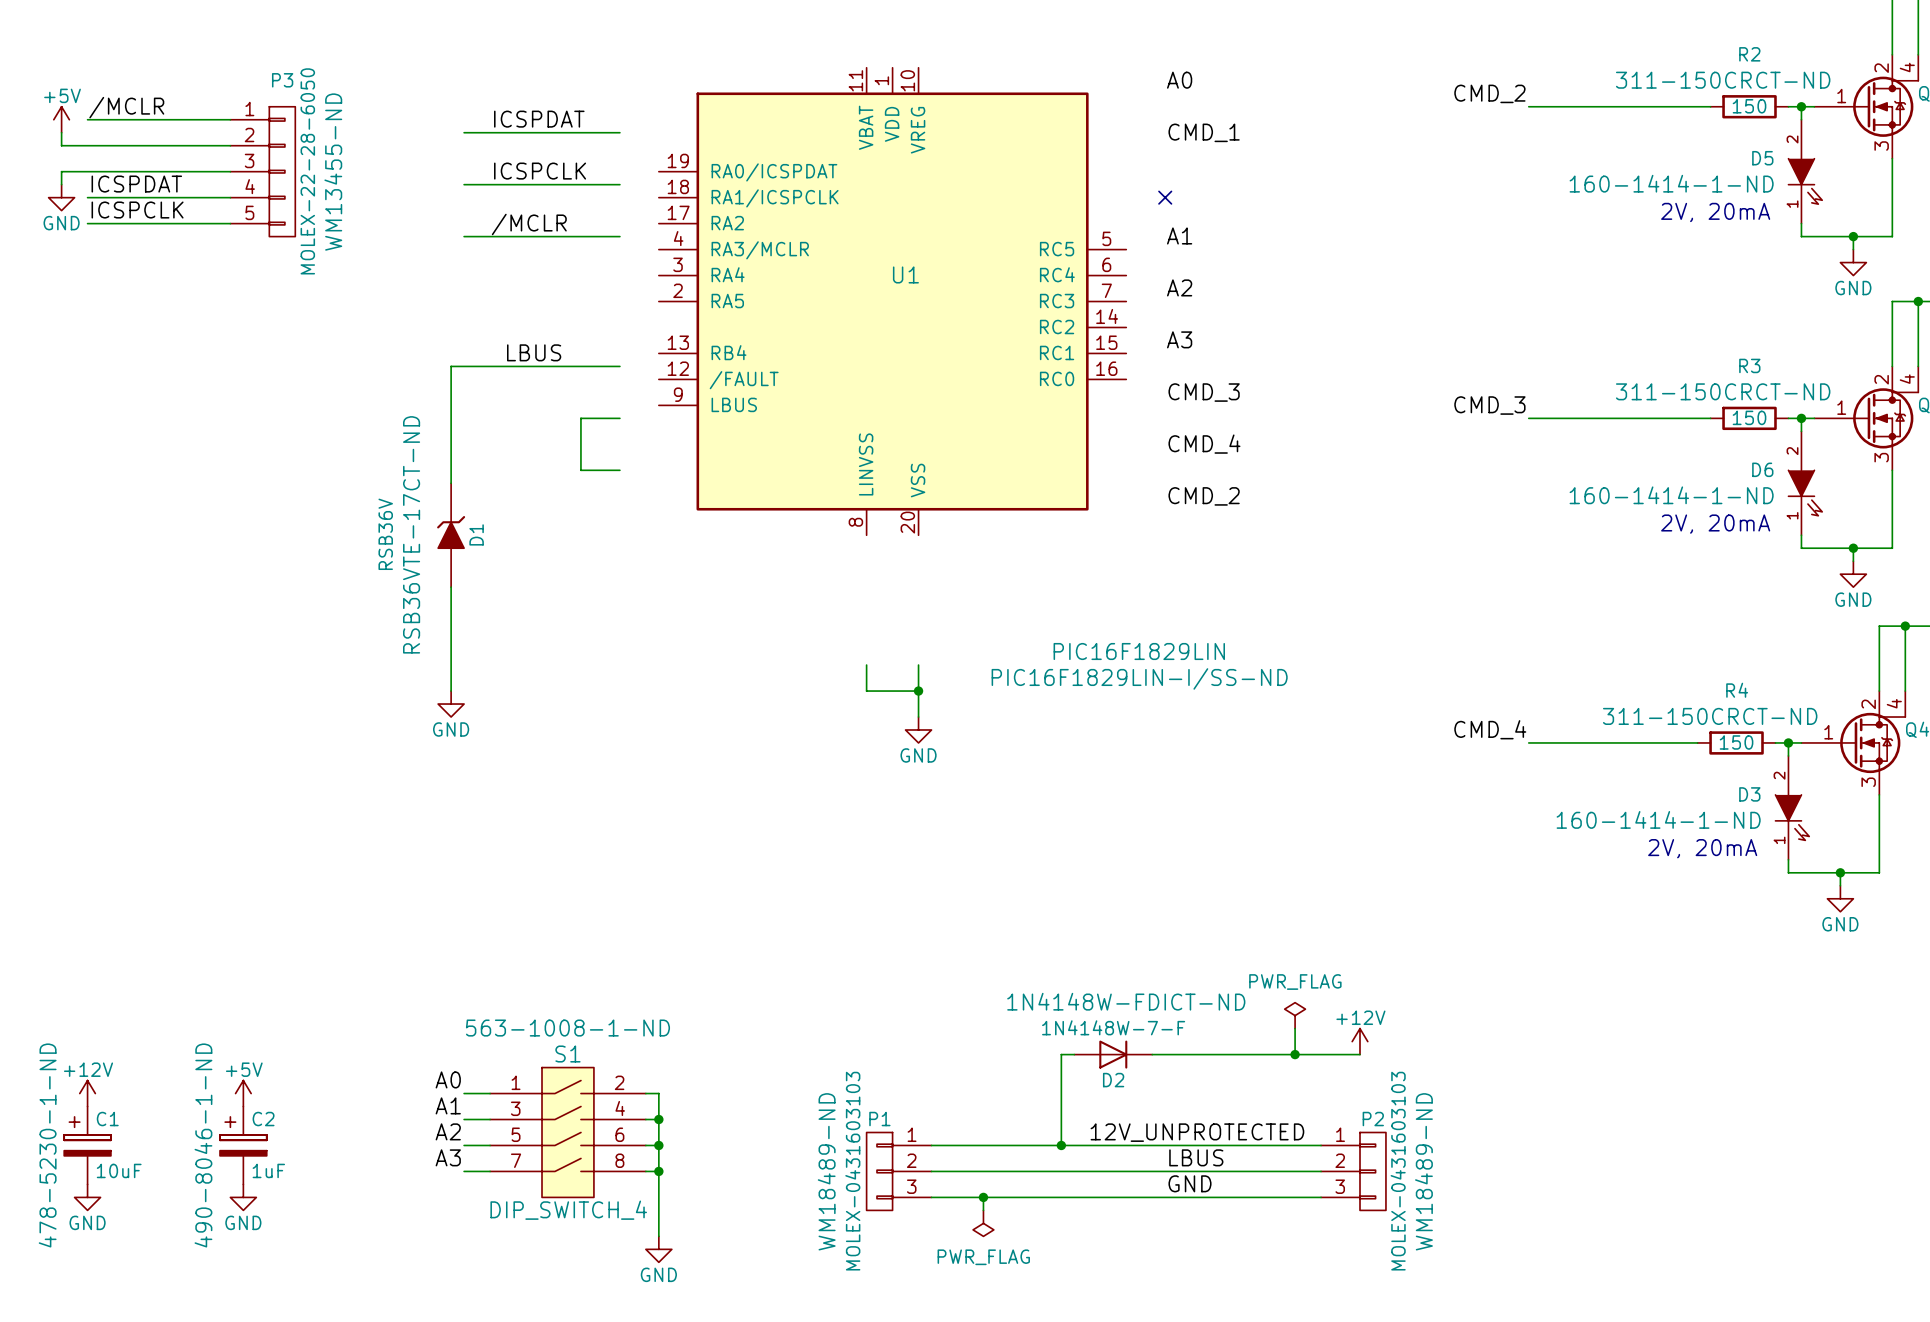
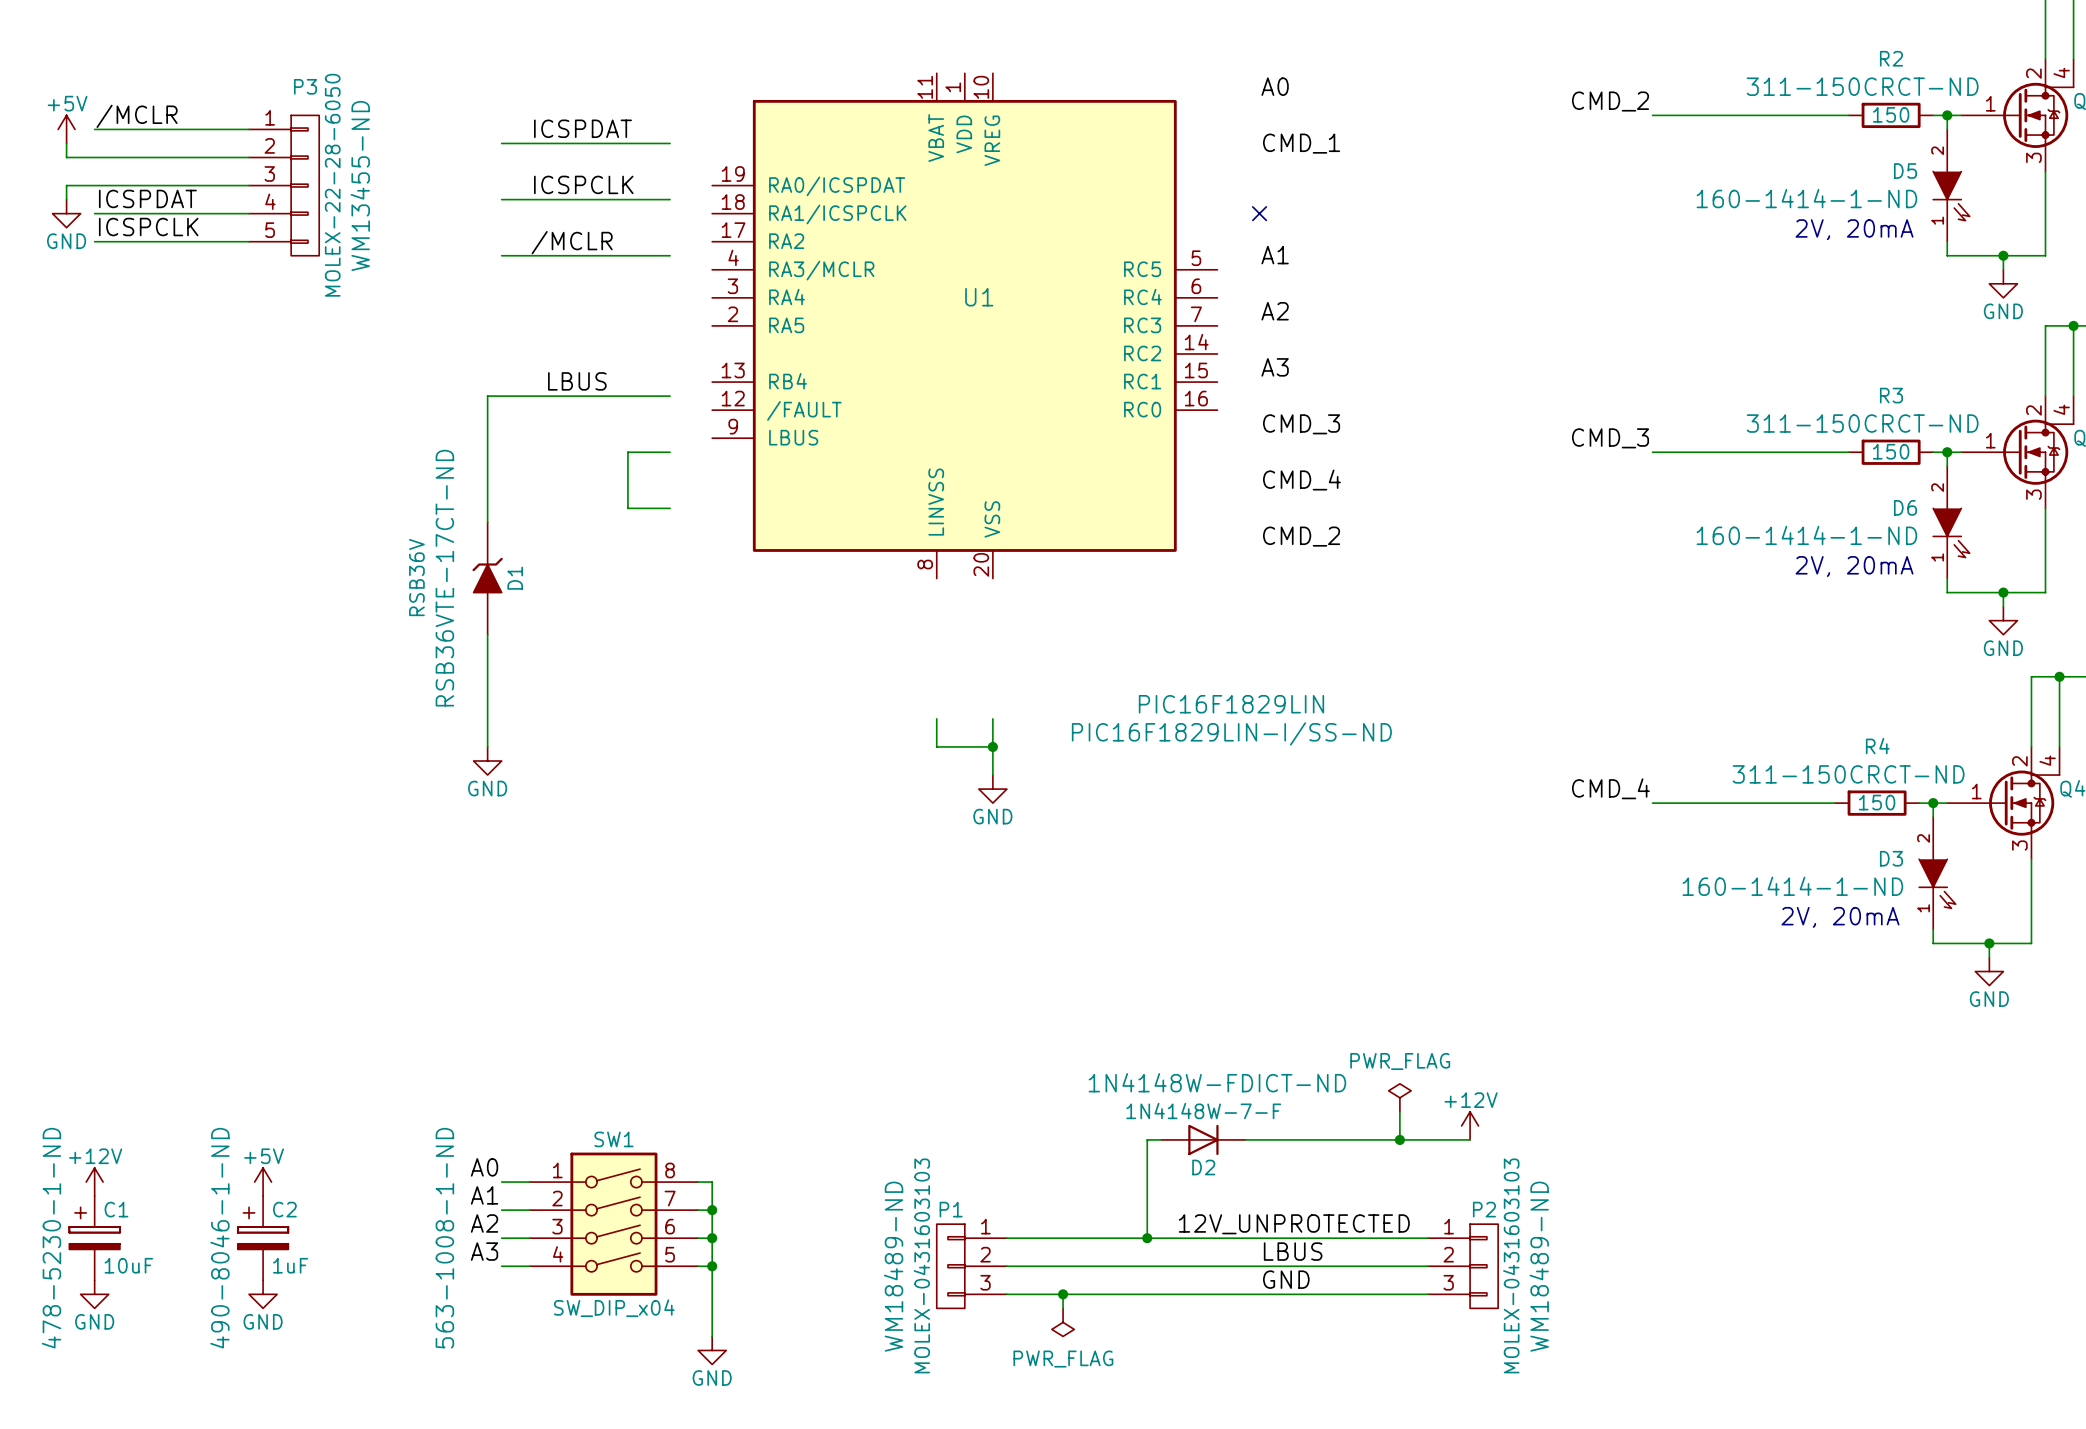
S1: DIP_SWITCH_4 (567, 1132) -> none
SW1: none -> SW_DIP_x04 (613, 1224)

